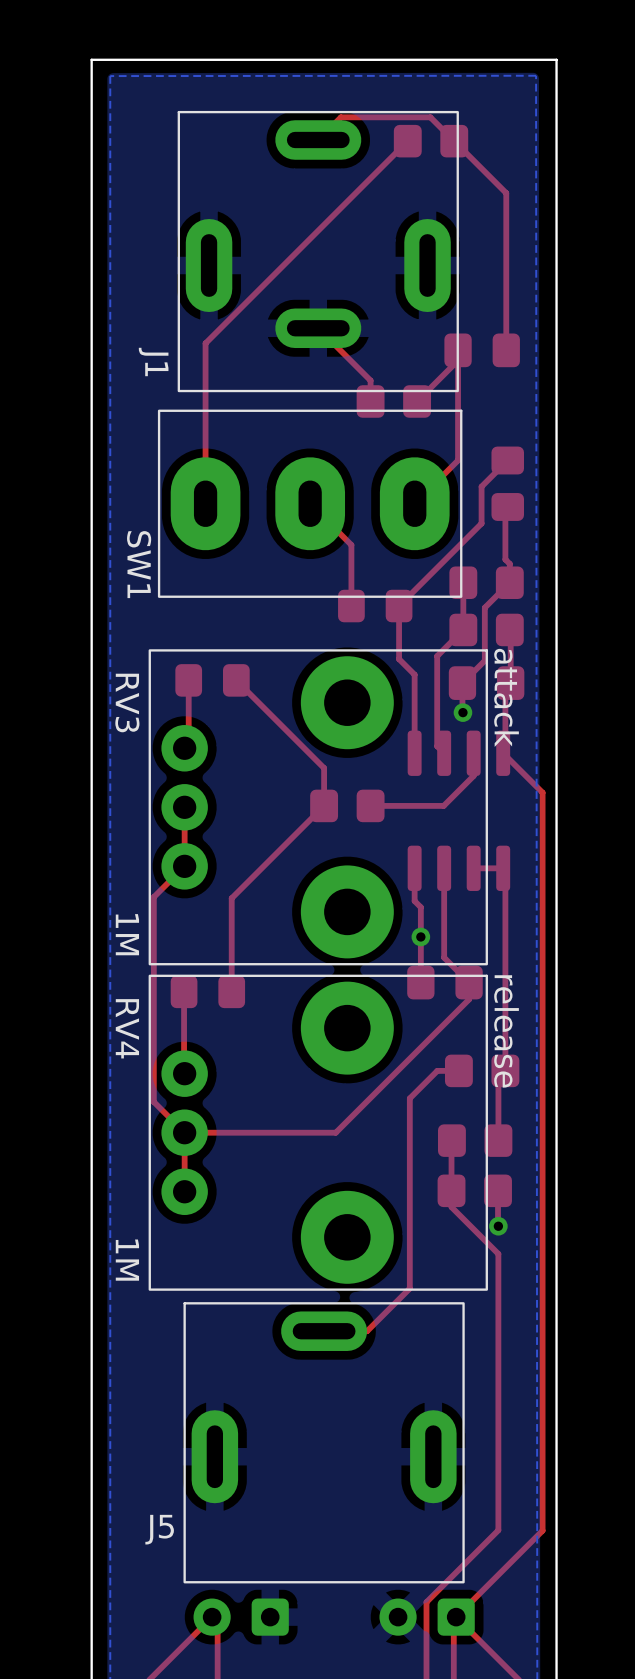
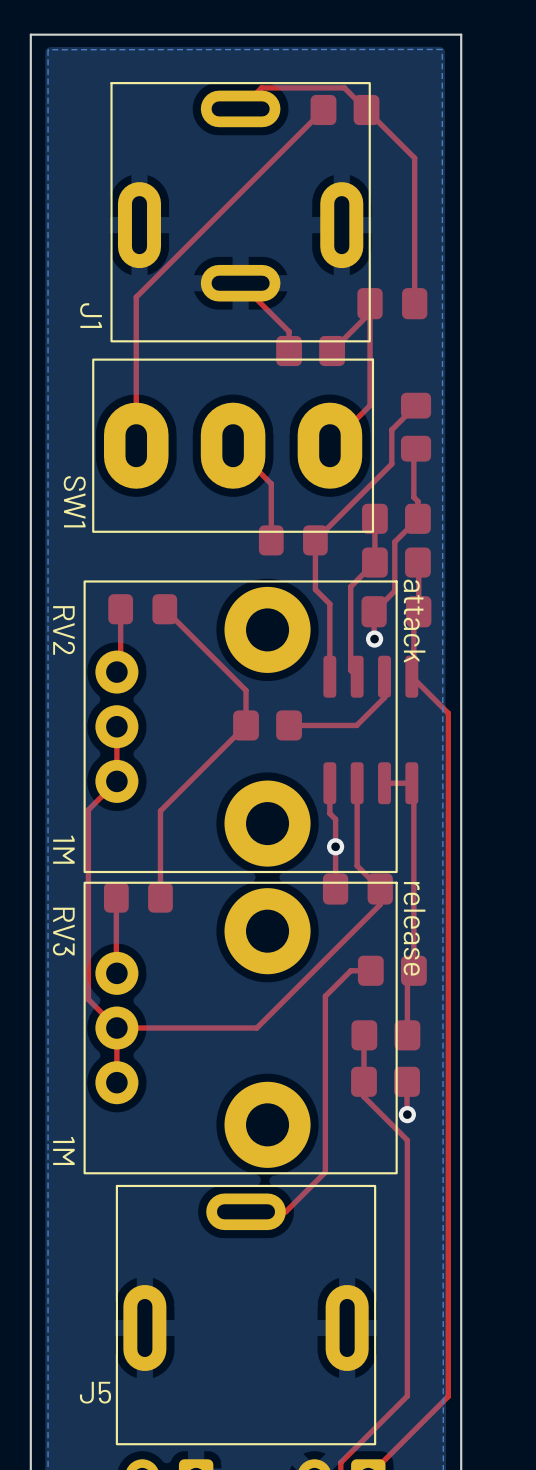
RV3 name: RV3 (127, 703) -> RV2 (64, 630)
RV4 name: RV4 (127, 1028) -> RV3 (63, 931)

